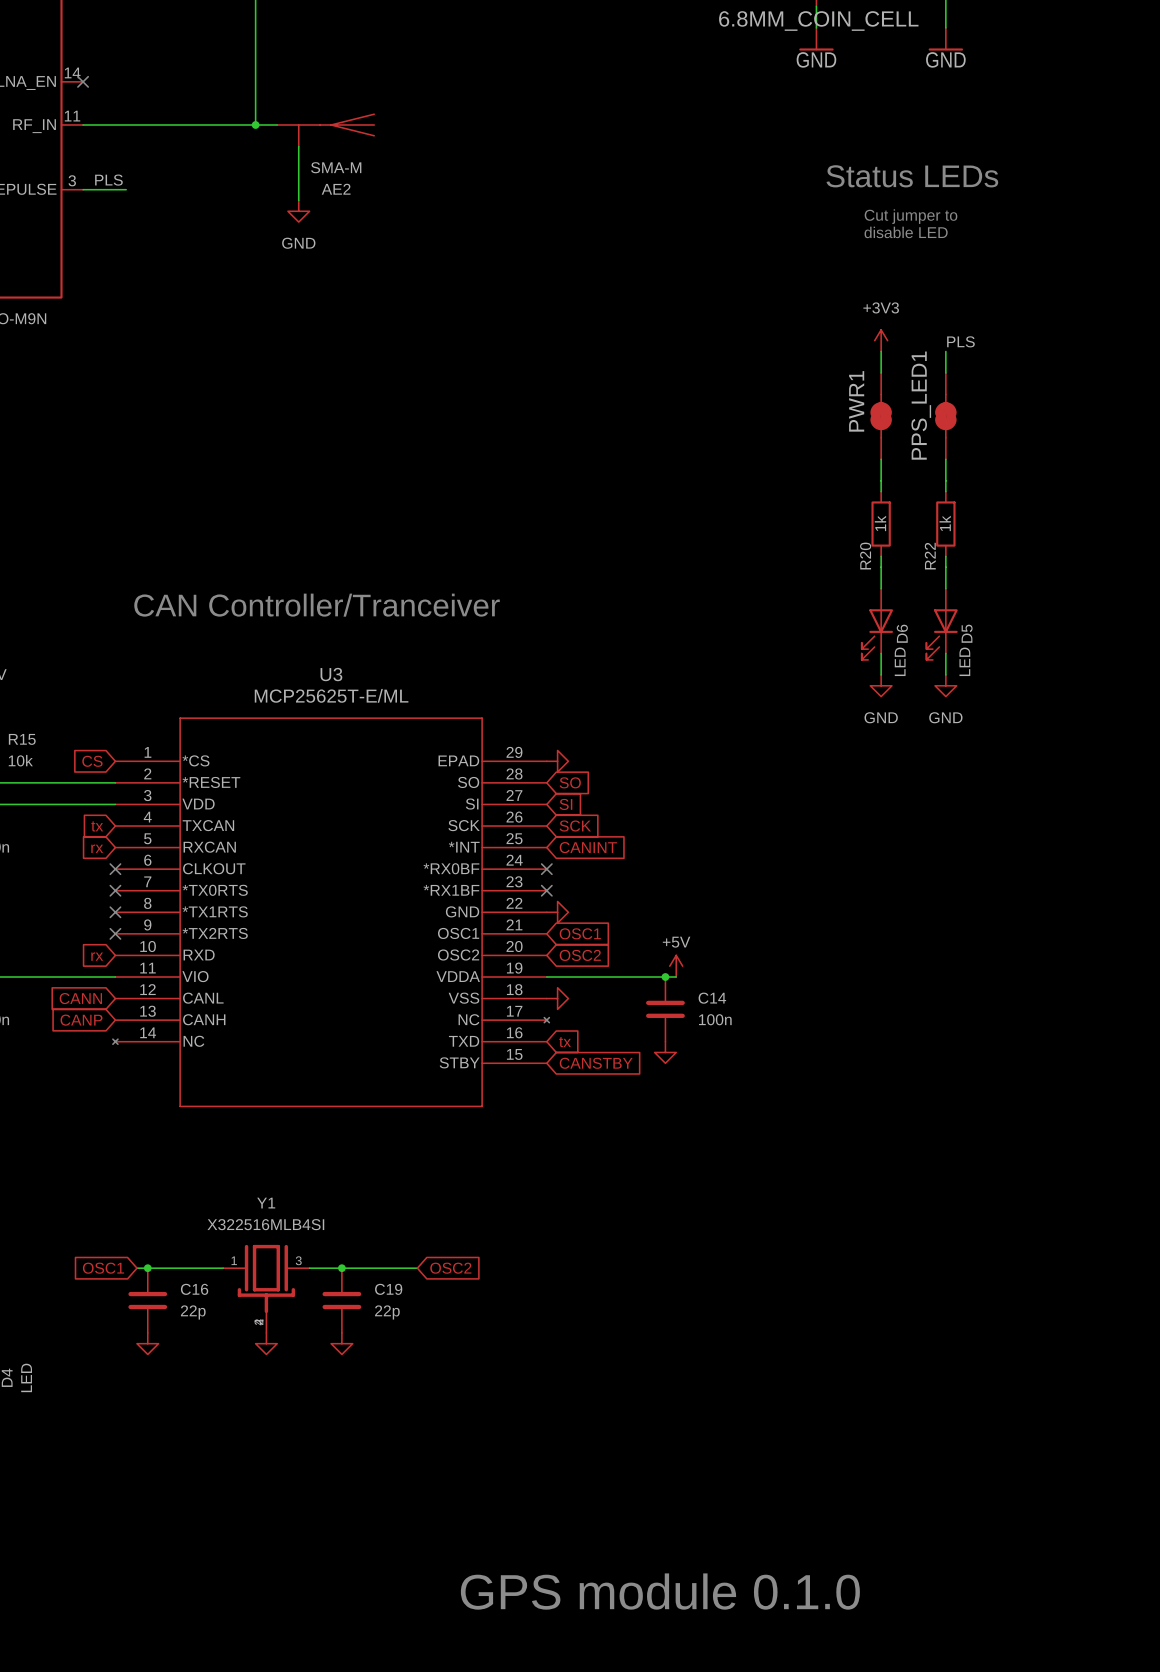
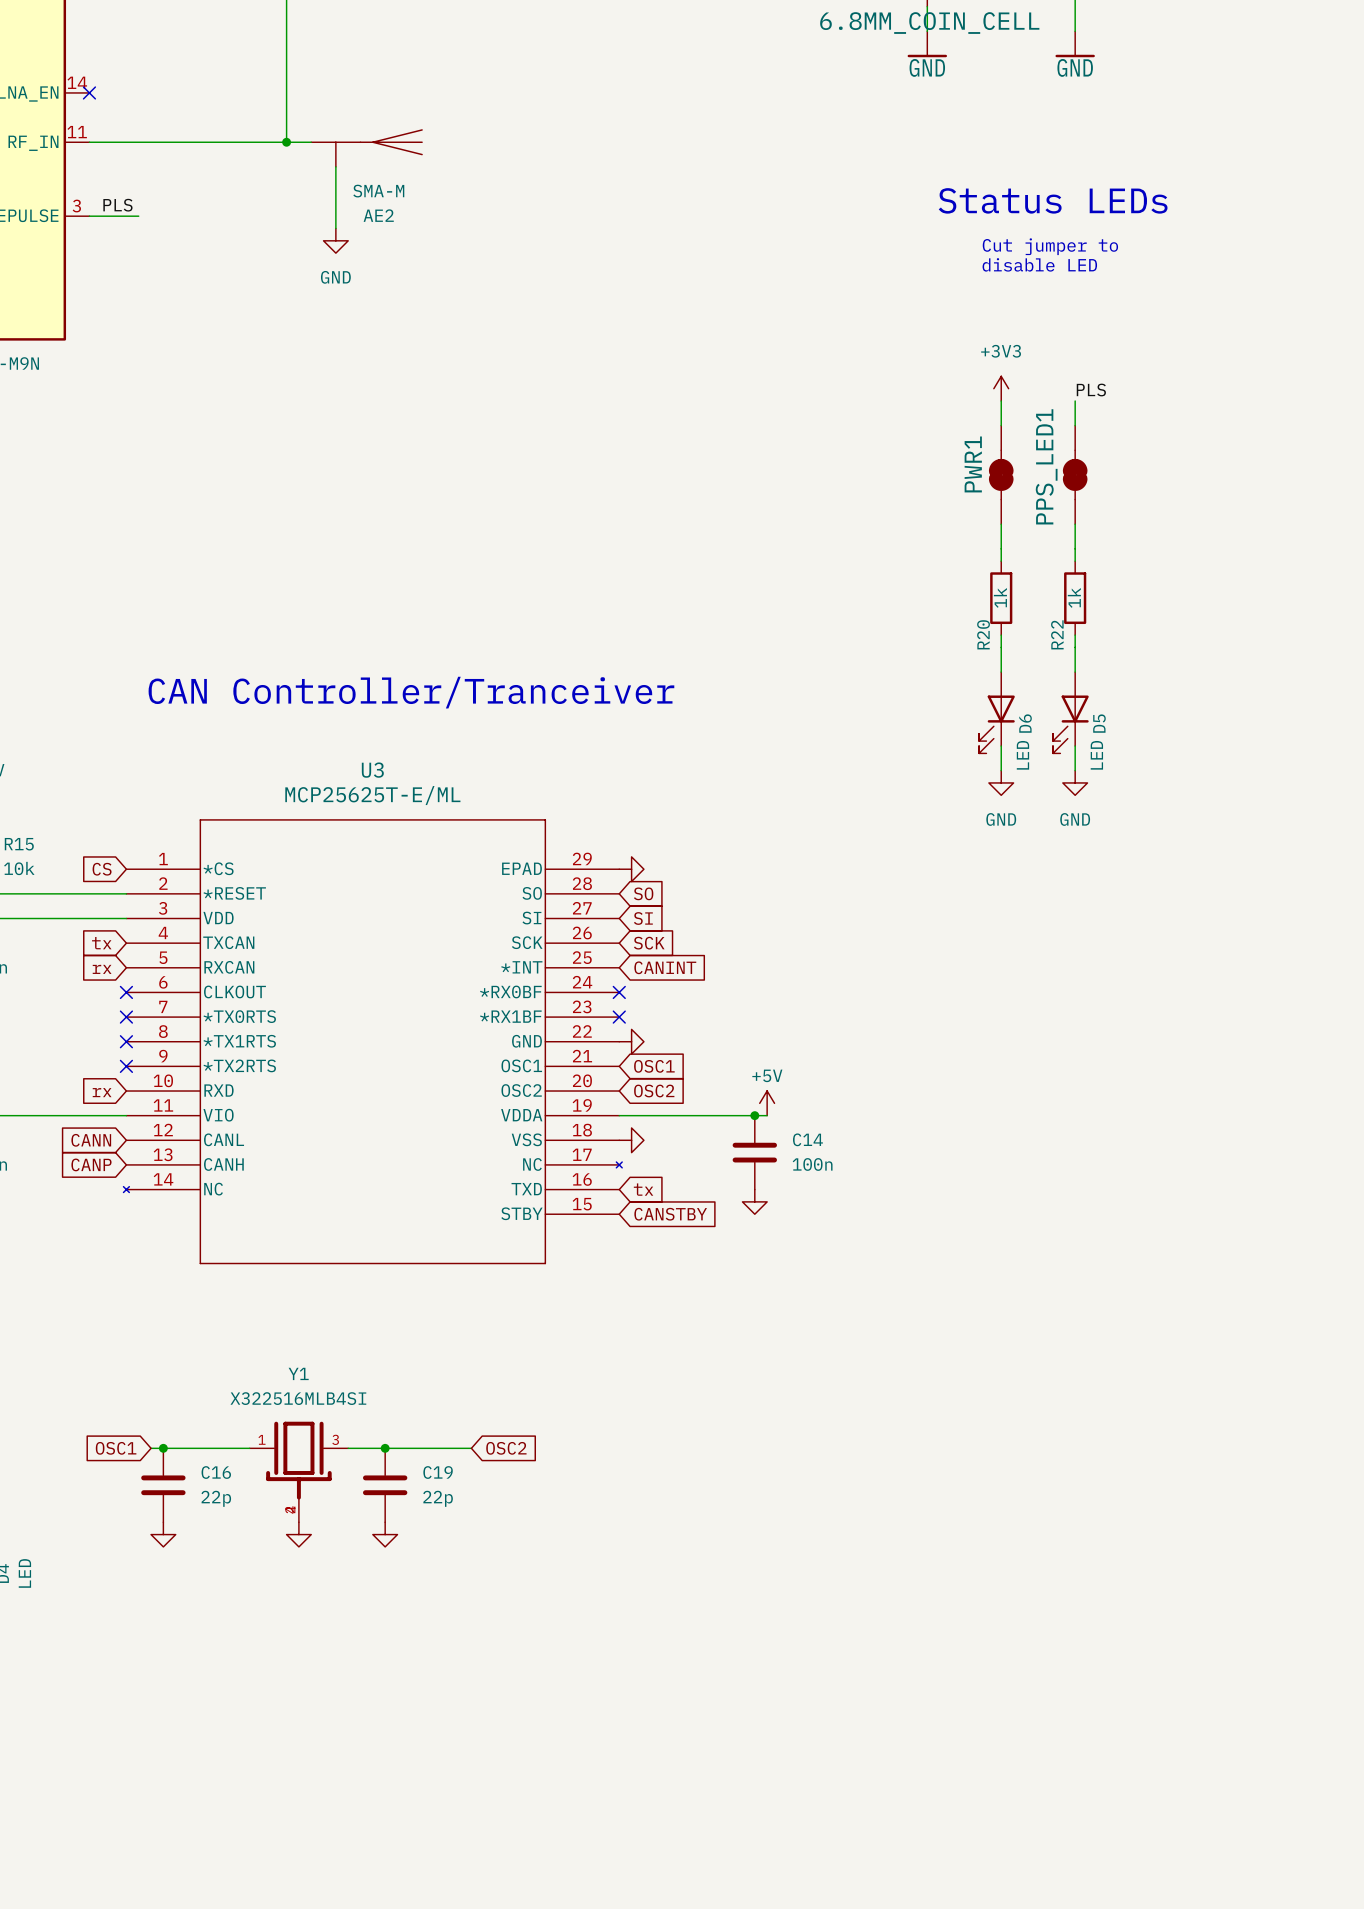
text: GPS module 0.1.0 (660, 1591) -> none

